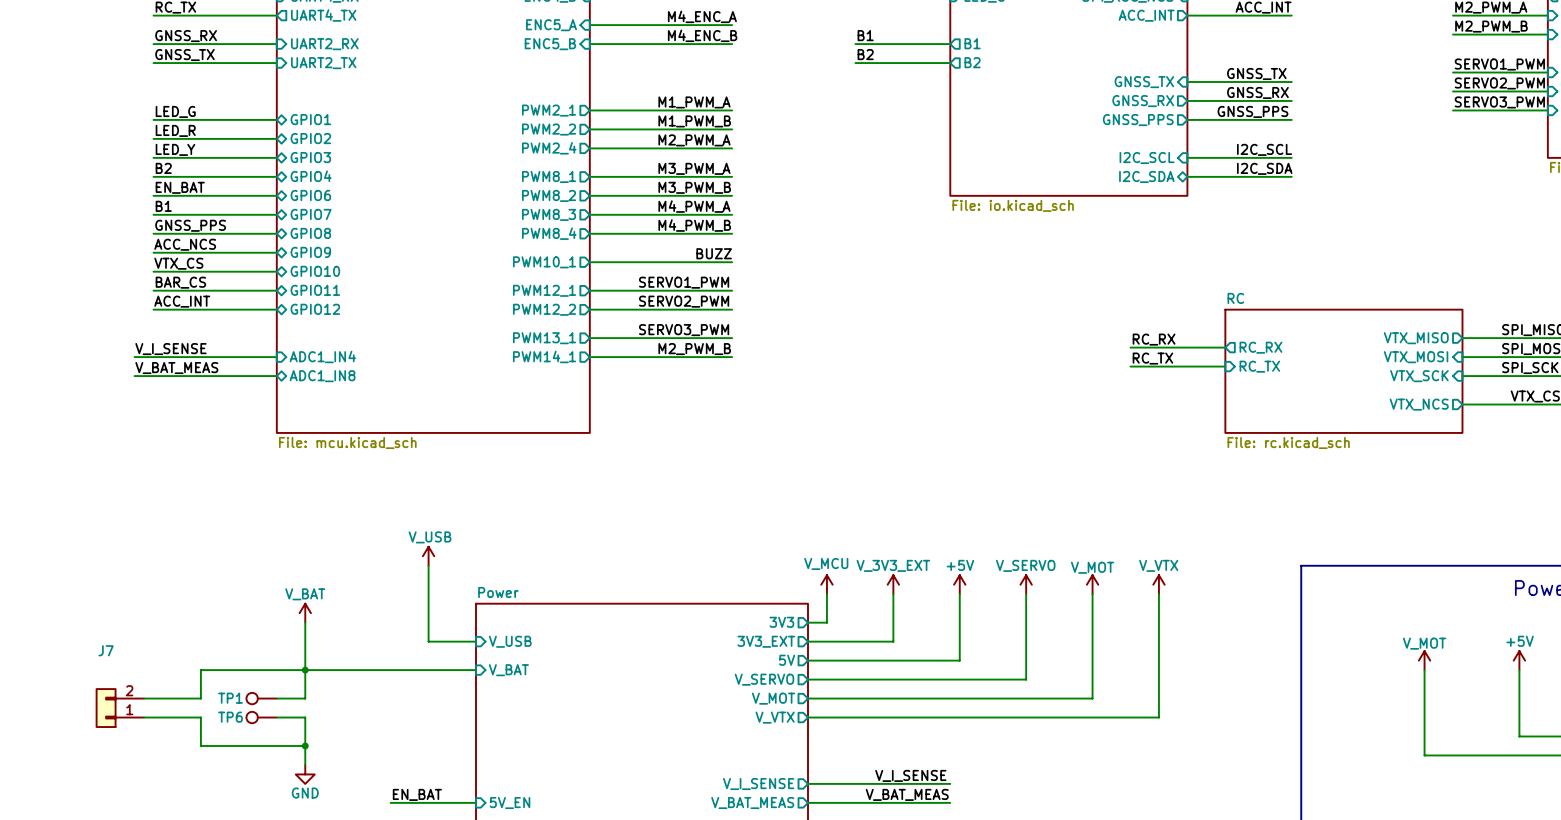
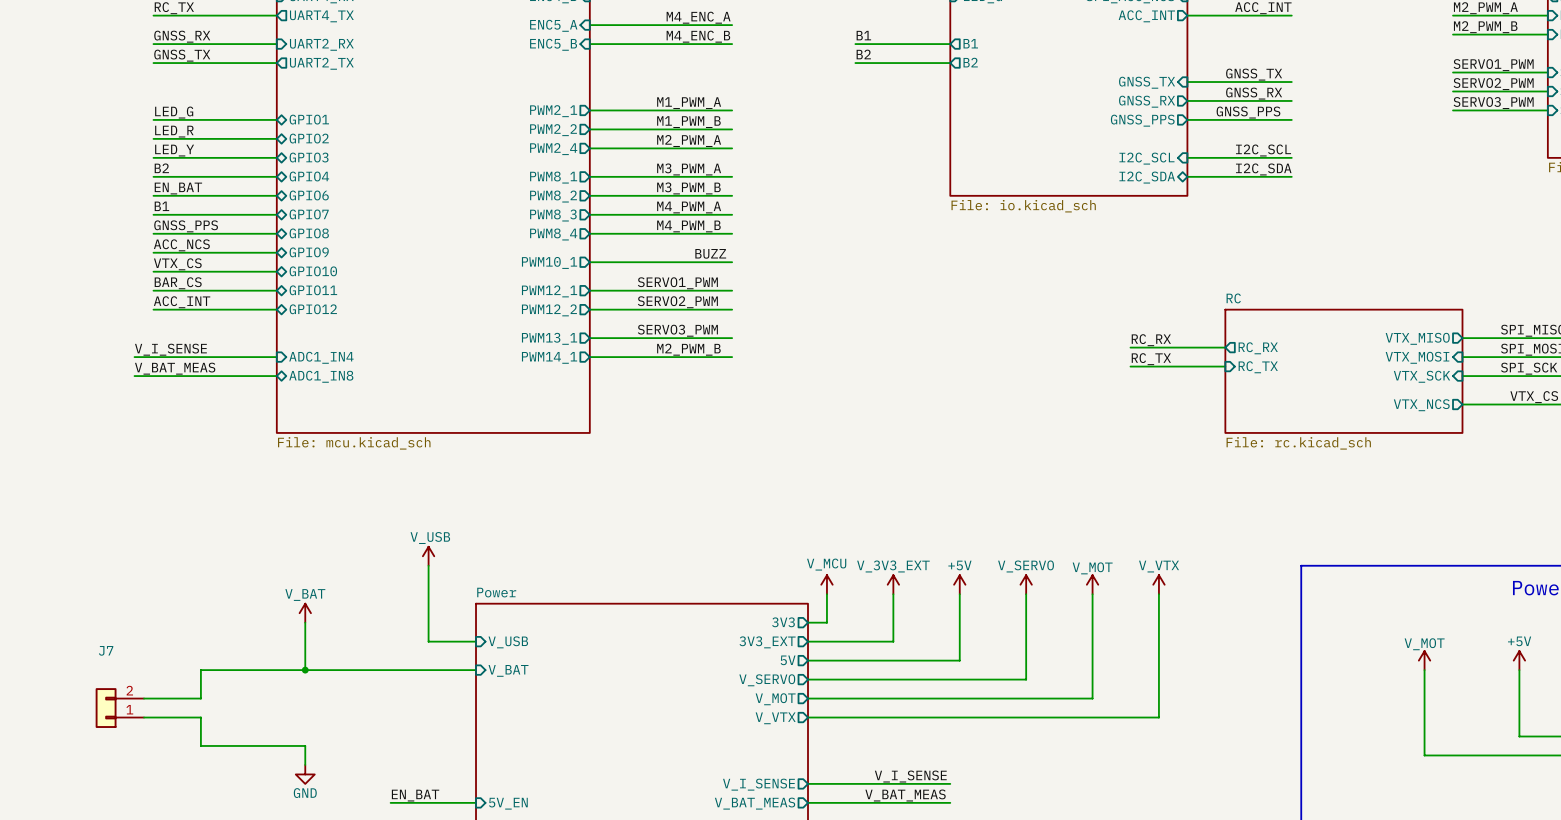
sheet pin shape: input (323, 63) -> output (321, 63)
wire: (305, 670) (305, 698) (276, 698) -> none
TP1: (261, 698) -> none
TP6: (261, 717) -> none
wire: (276, 717) (305, 717) (305, 745) -> none
junction: (305, 745) -> none

